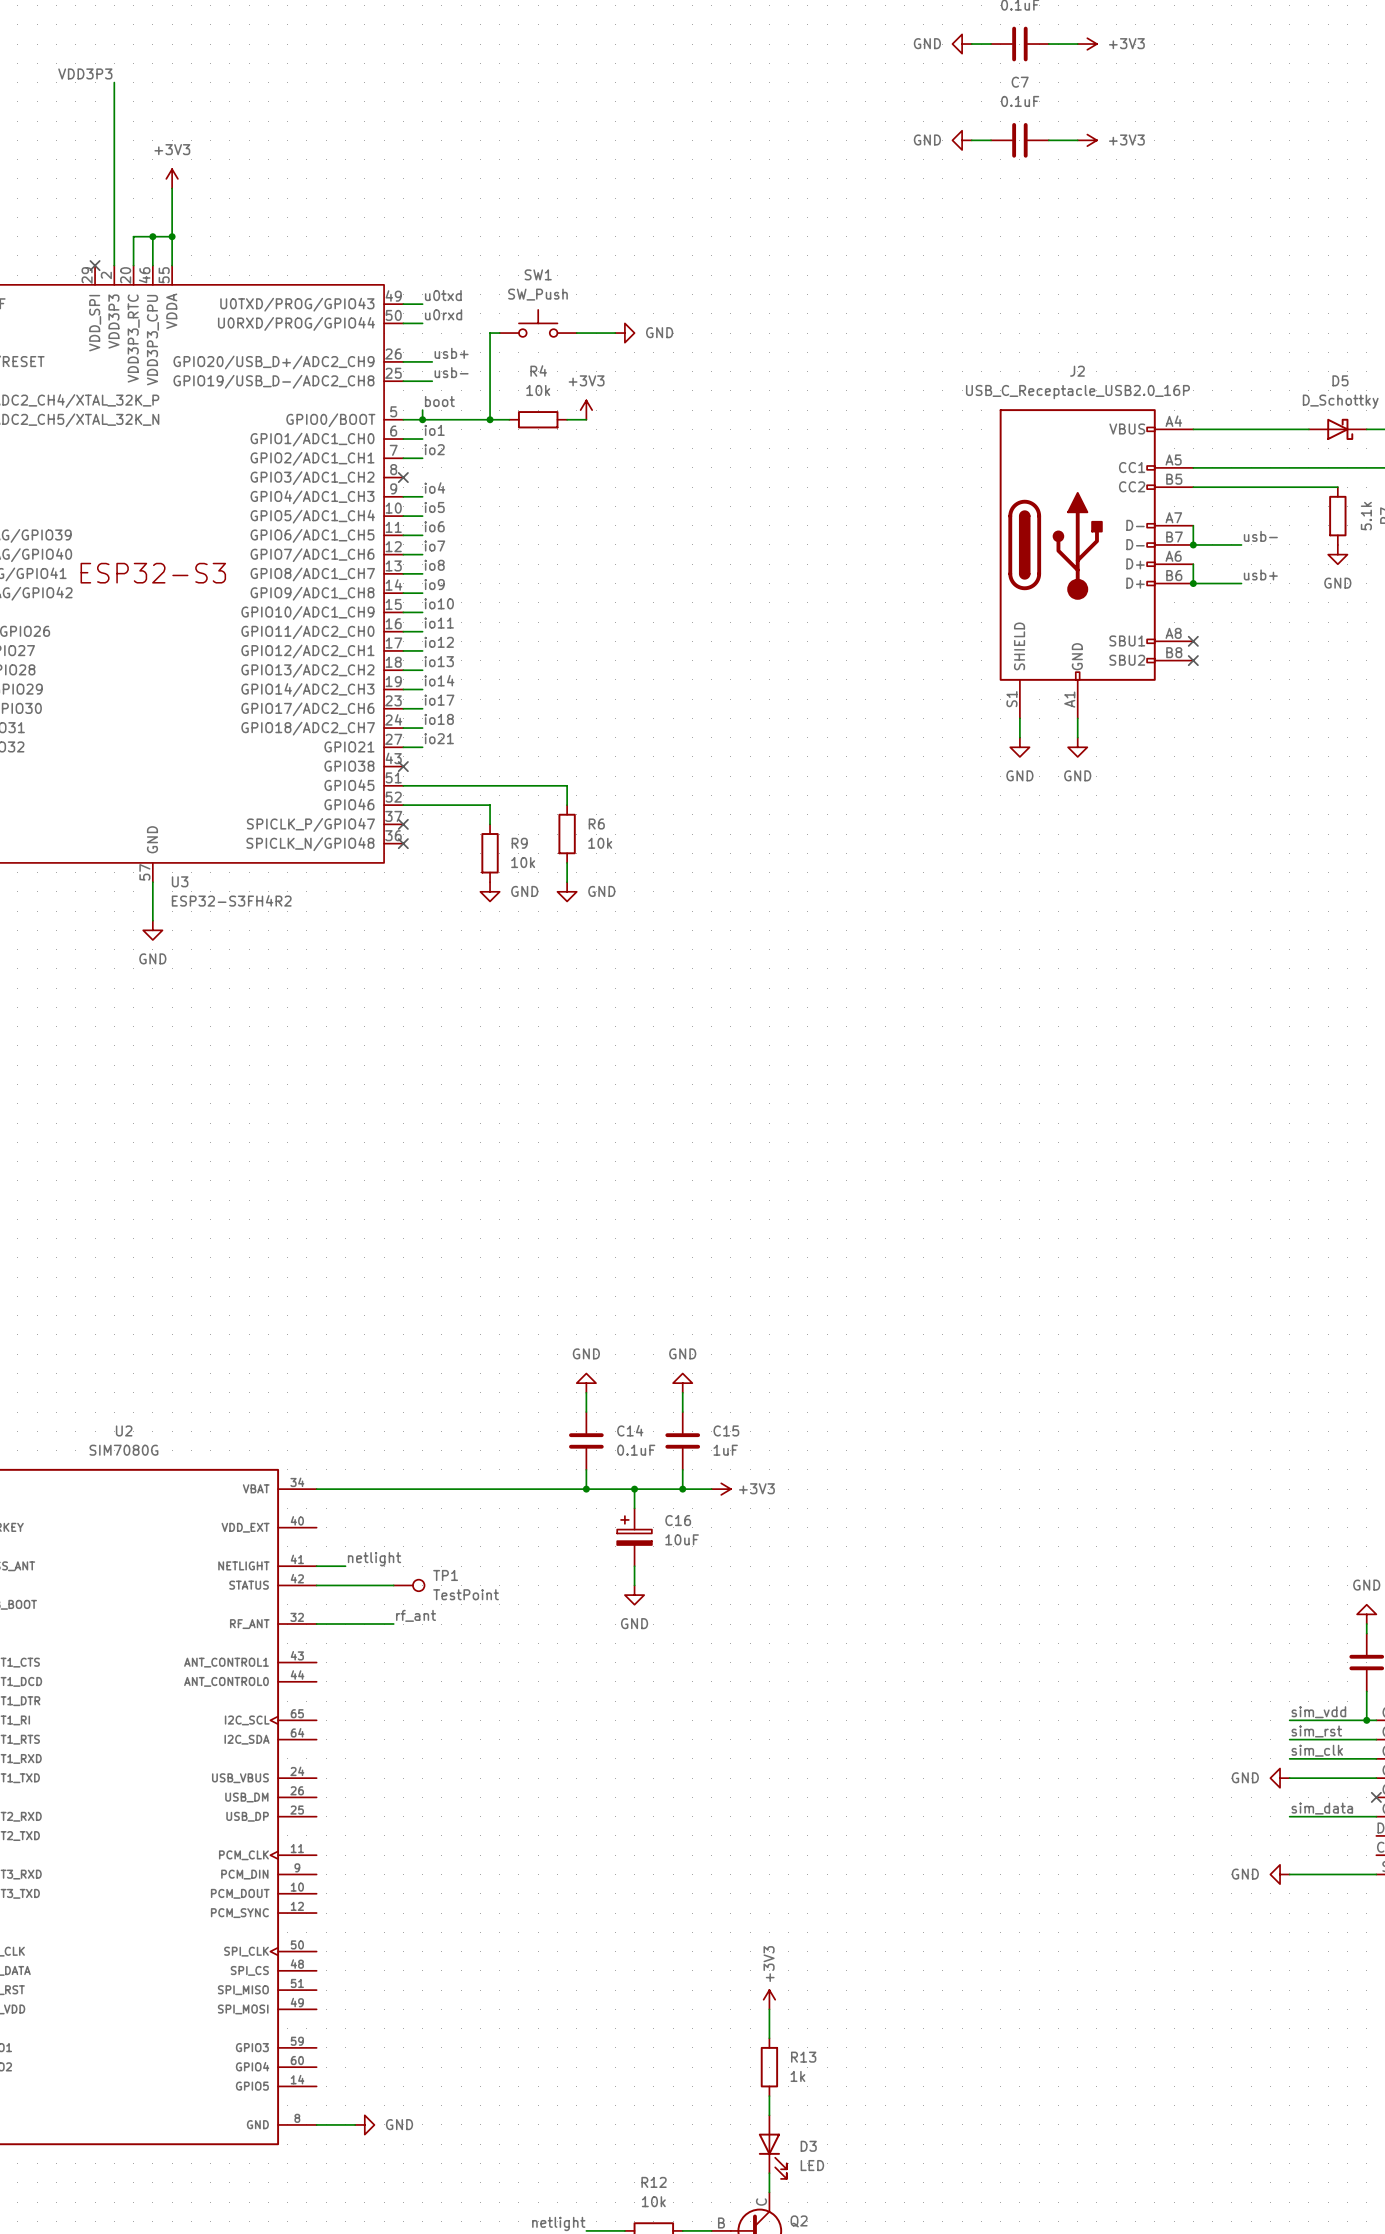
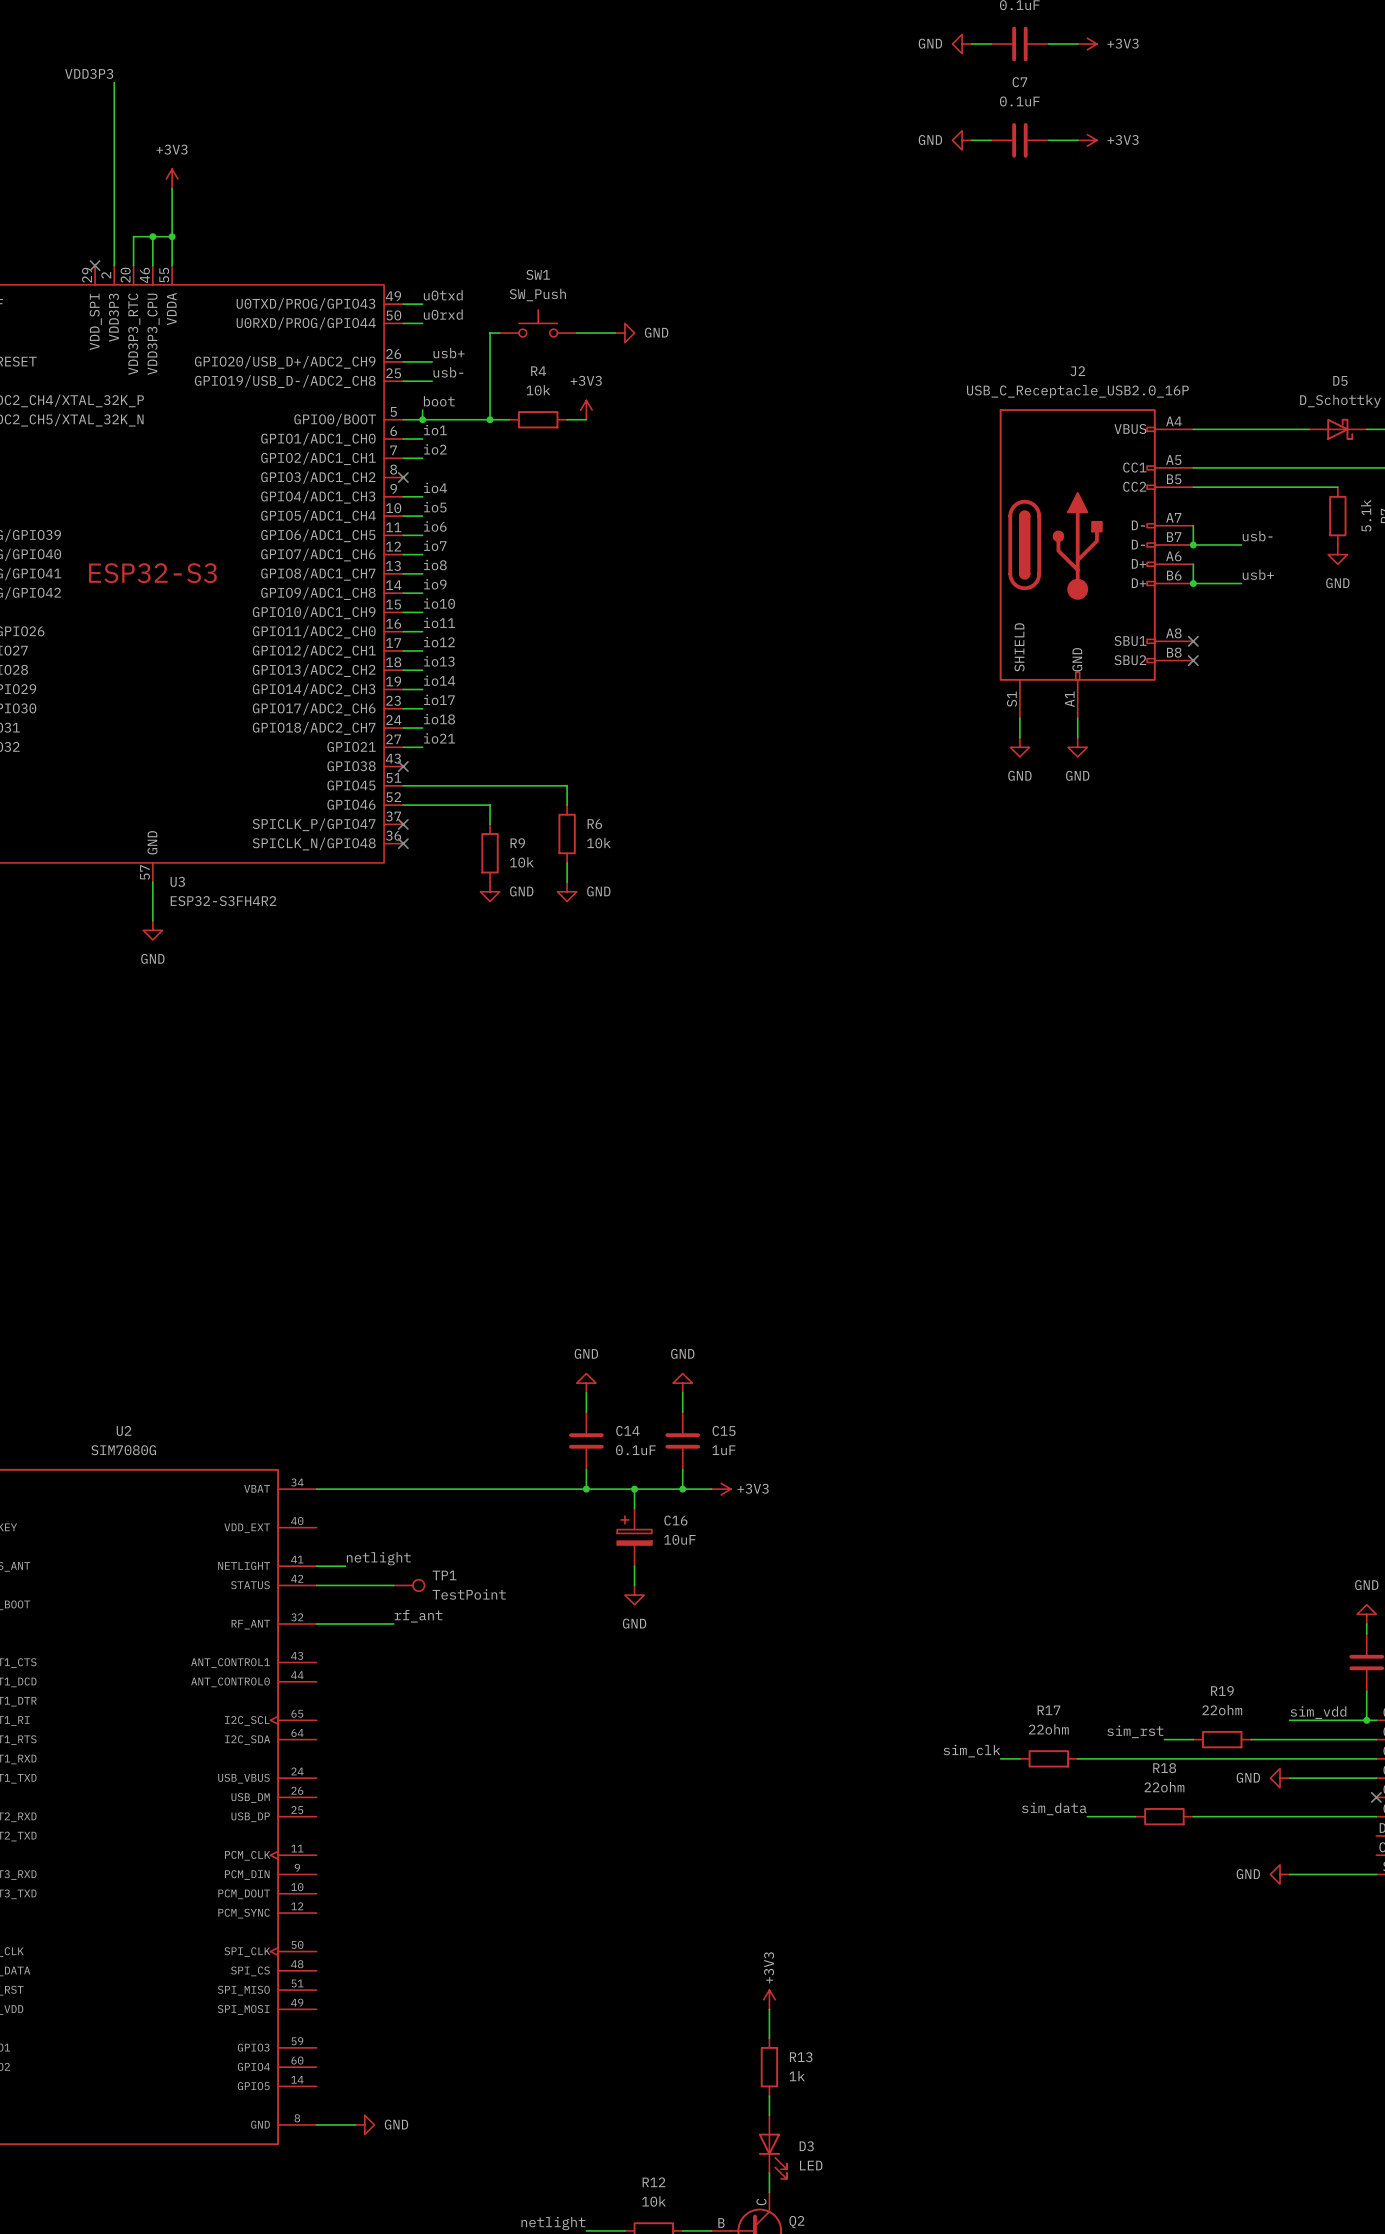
label position: sim_rst (1316, 1731) -> sim_rst (1135, 1731)
wire: none -> (1164, 1739) (1193, 1739)
R19: none -> 22ohm (1222, 1739)
wire: none -> (1251, 1739) (1289, 1739)
label: none -> sim_clk (971, 1751)
label: sim_clk (1317, 1750) -> none
wire: none -> (1000, 1758) (1019, 1758)
R17: none -> 22ohm (1048, 1758)
wire: none -> (1077, 1758) (1289, 1758)
label: none -> sim_data (1054, 1808)
label: sim_data (1322, 1808) -> none
wire: none -> (1087, 1816) (1135, 1816)
R18: none -> 22ohm (1164, 1816)
wire: none -> (1193, 1816) (1289, 1816)

